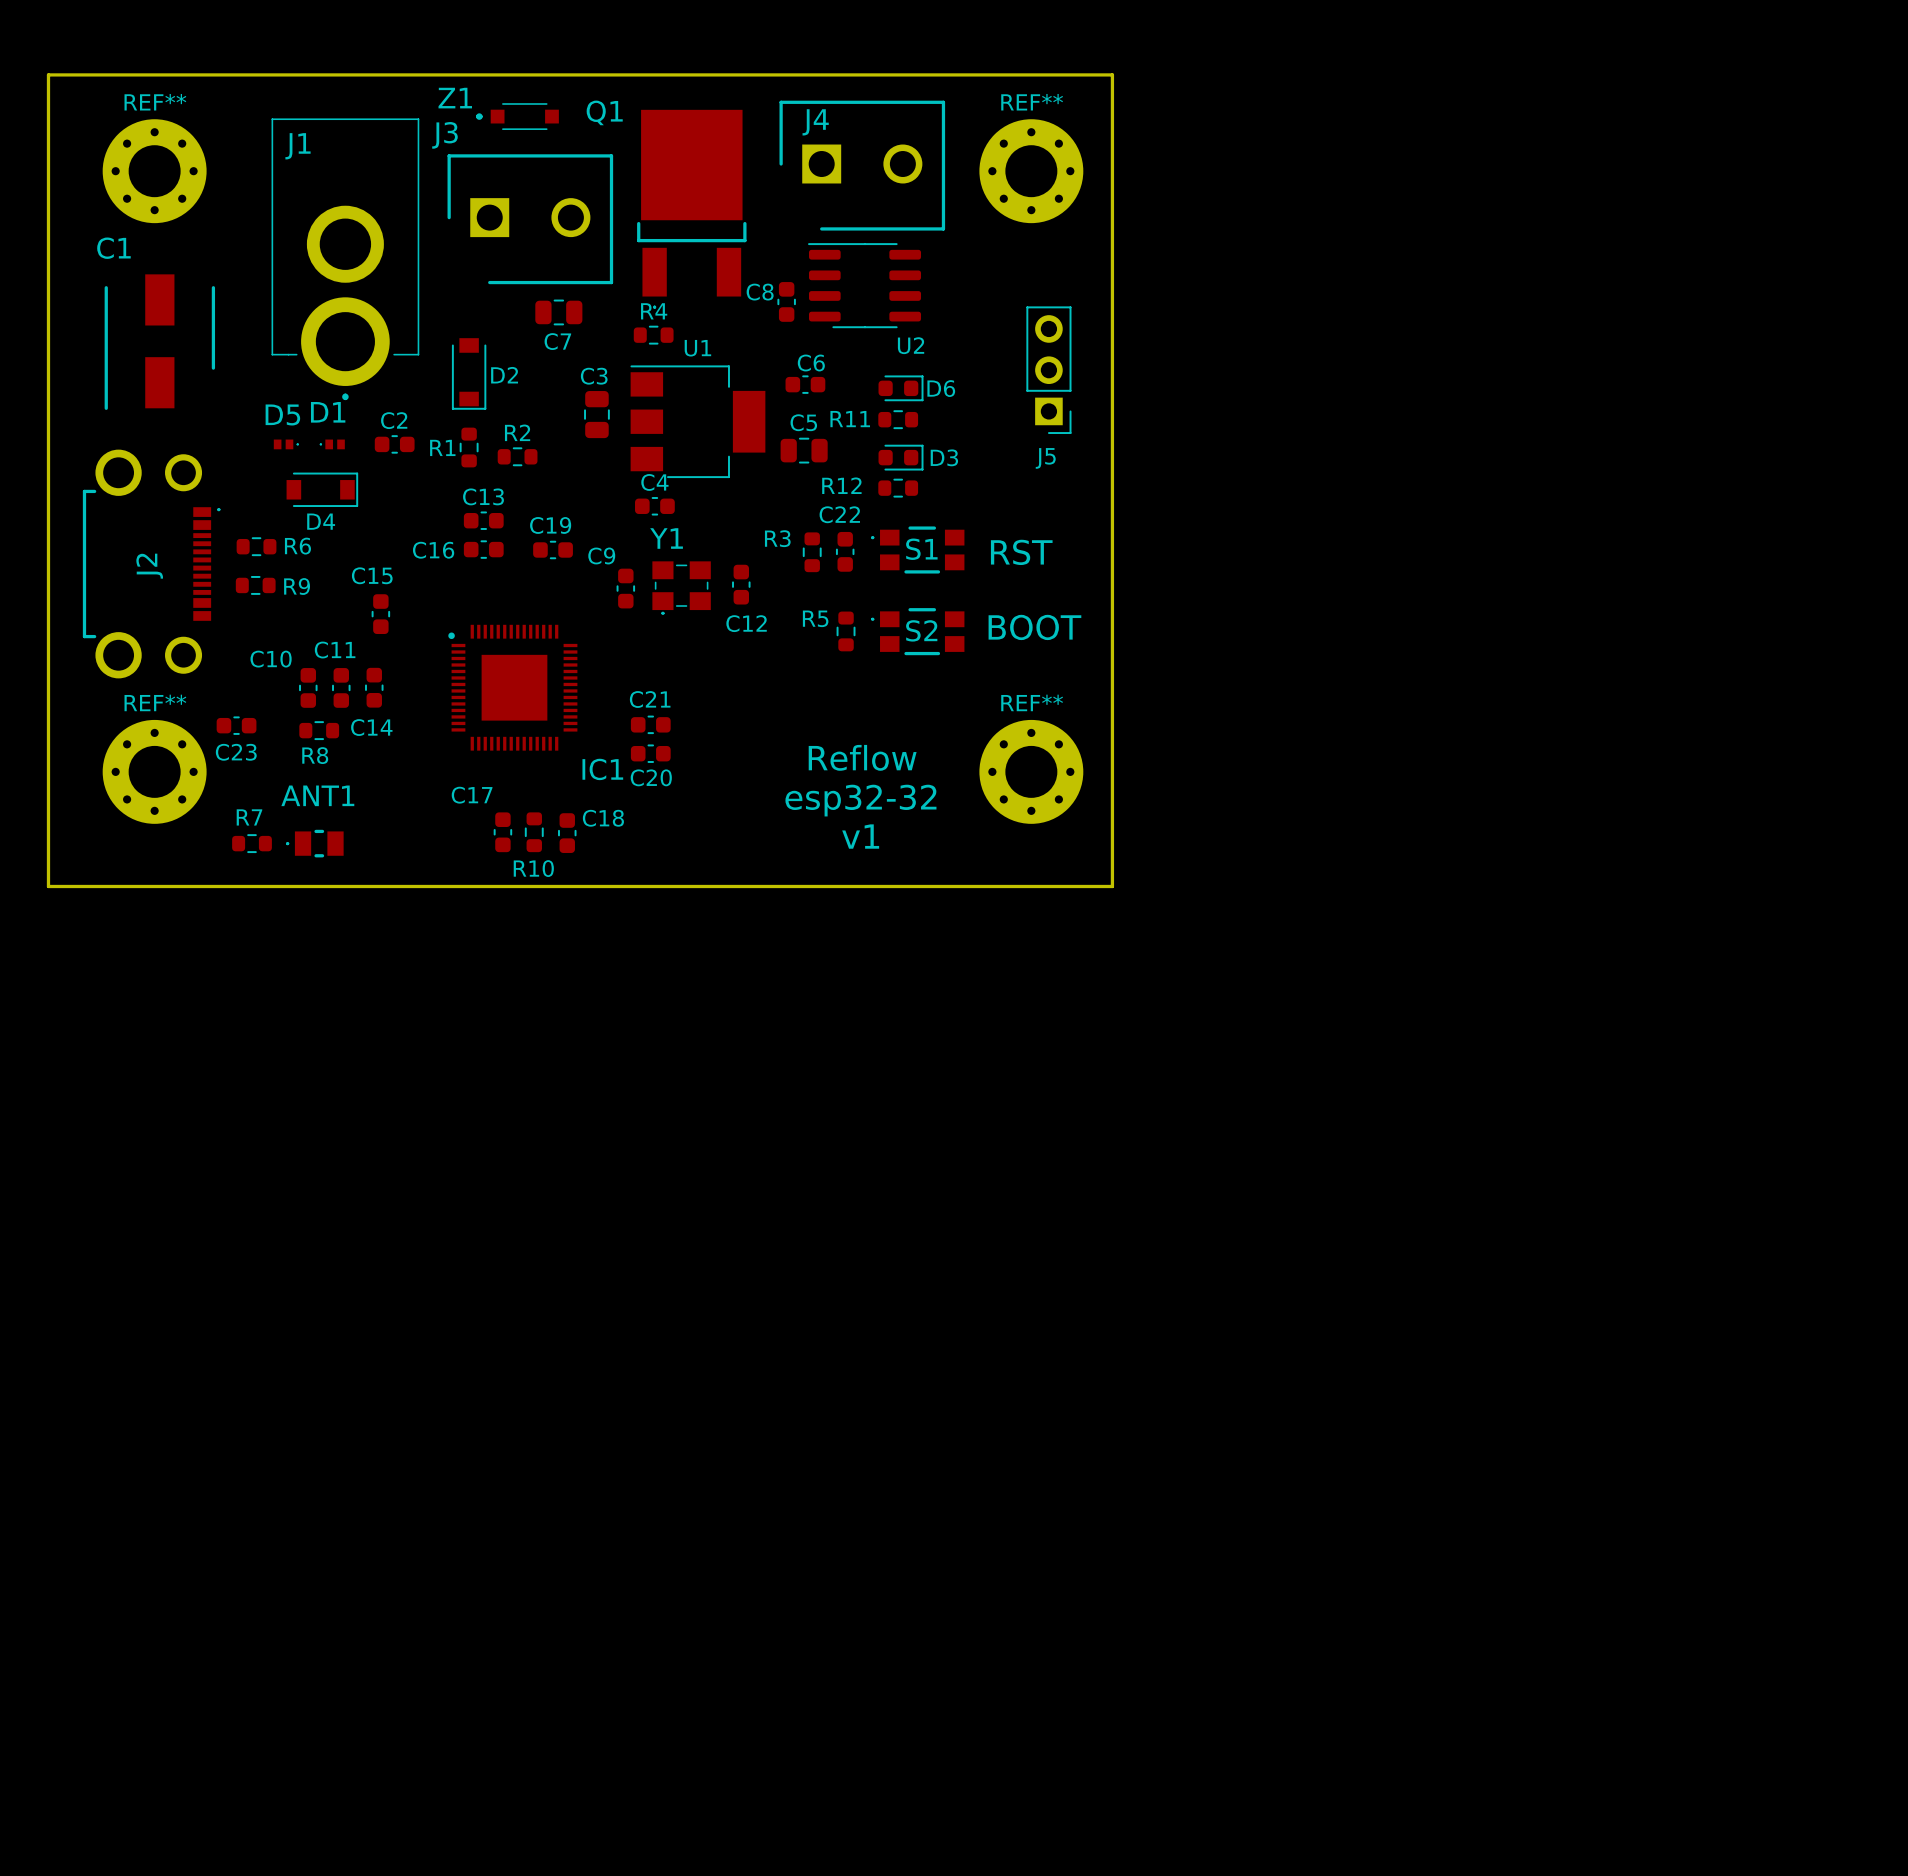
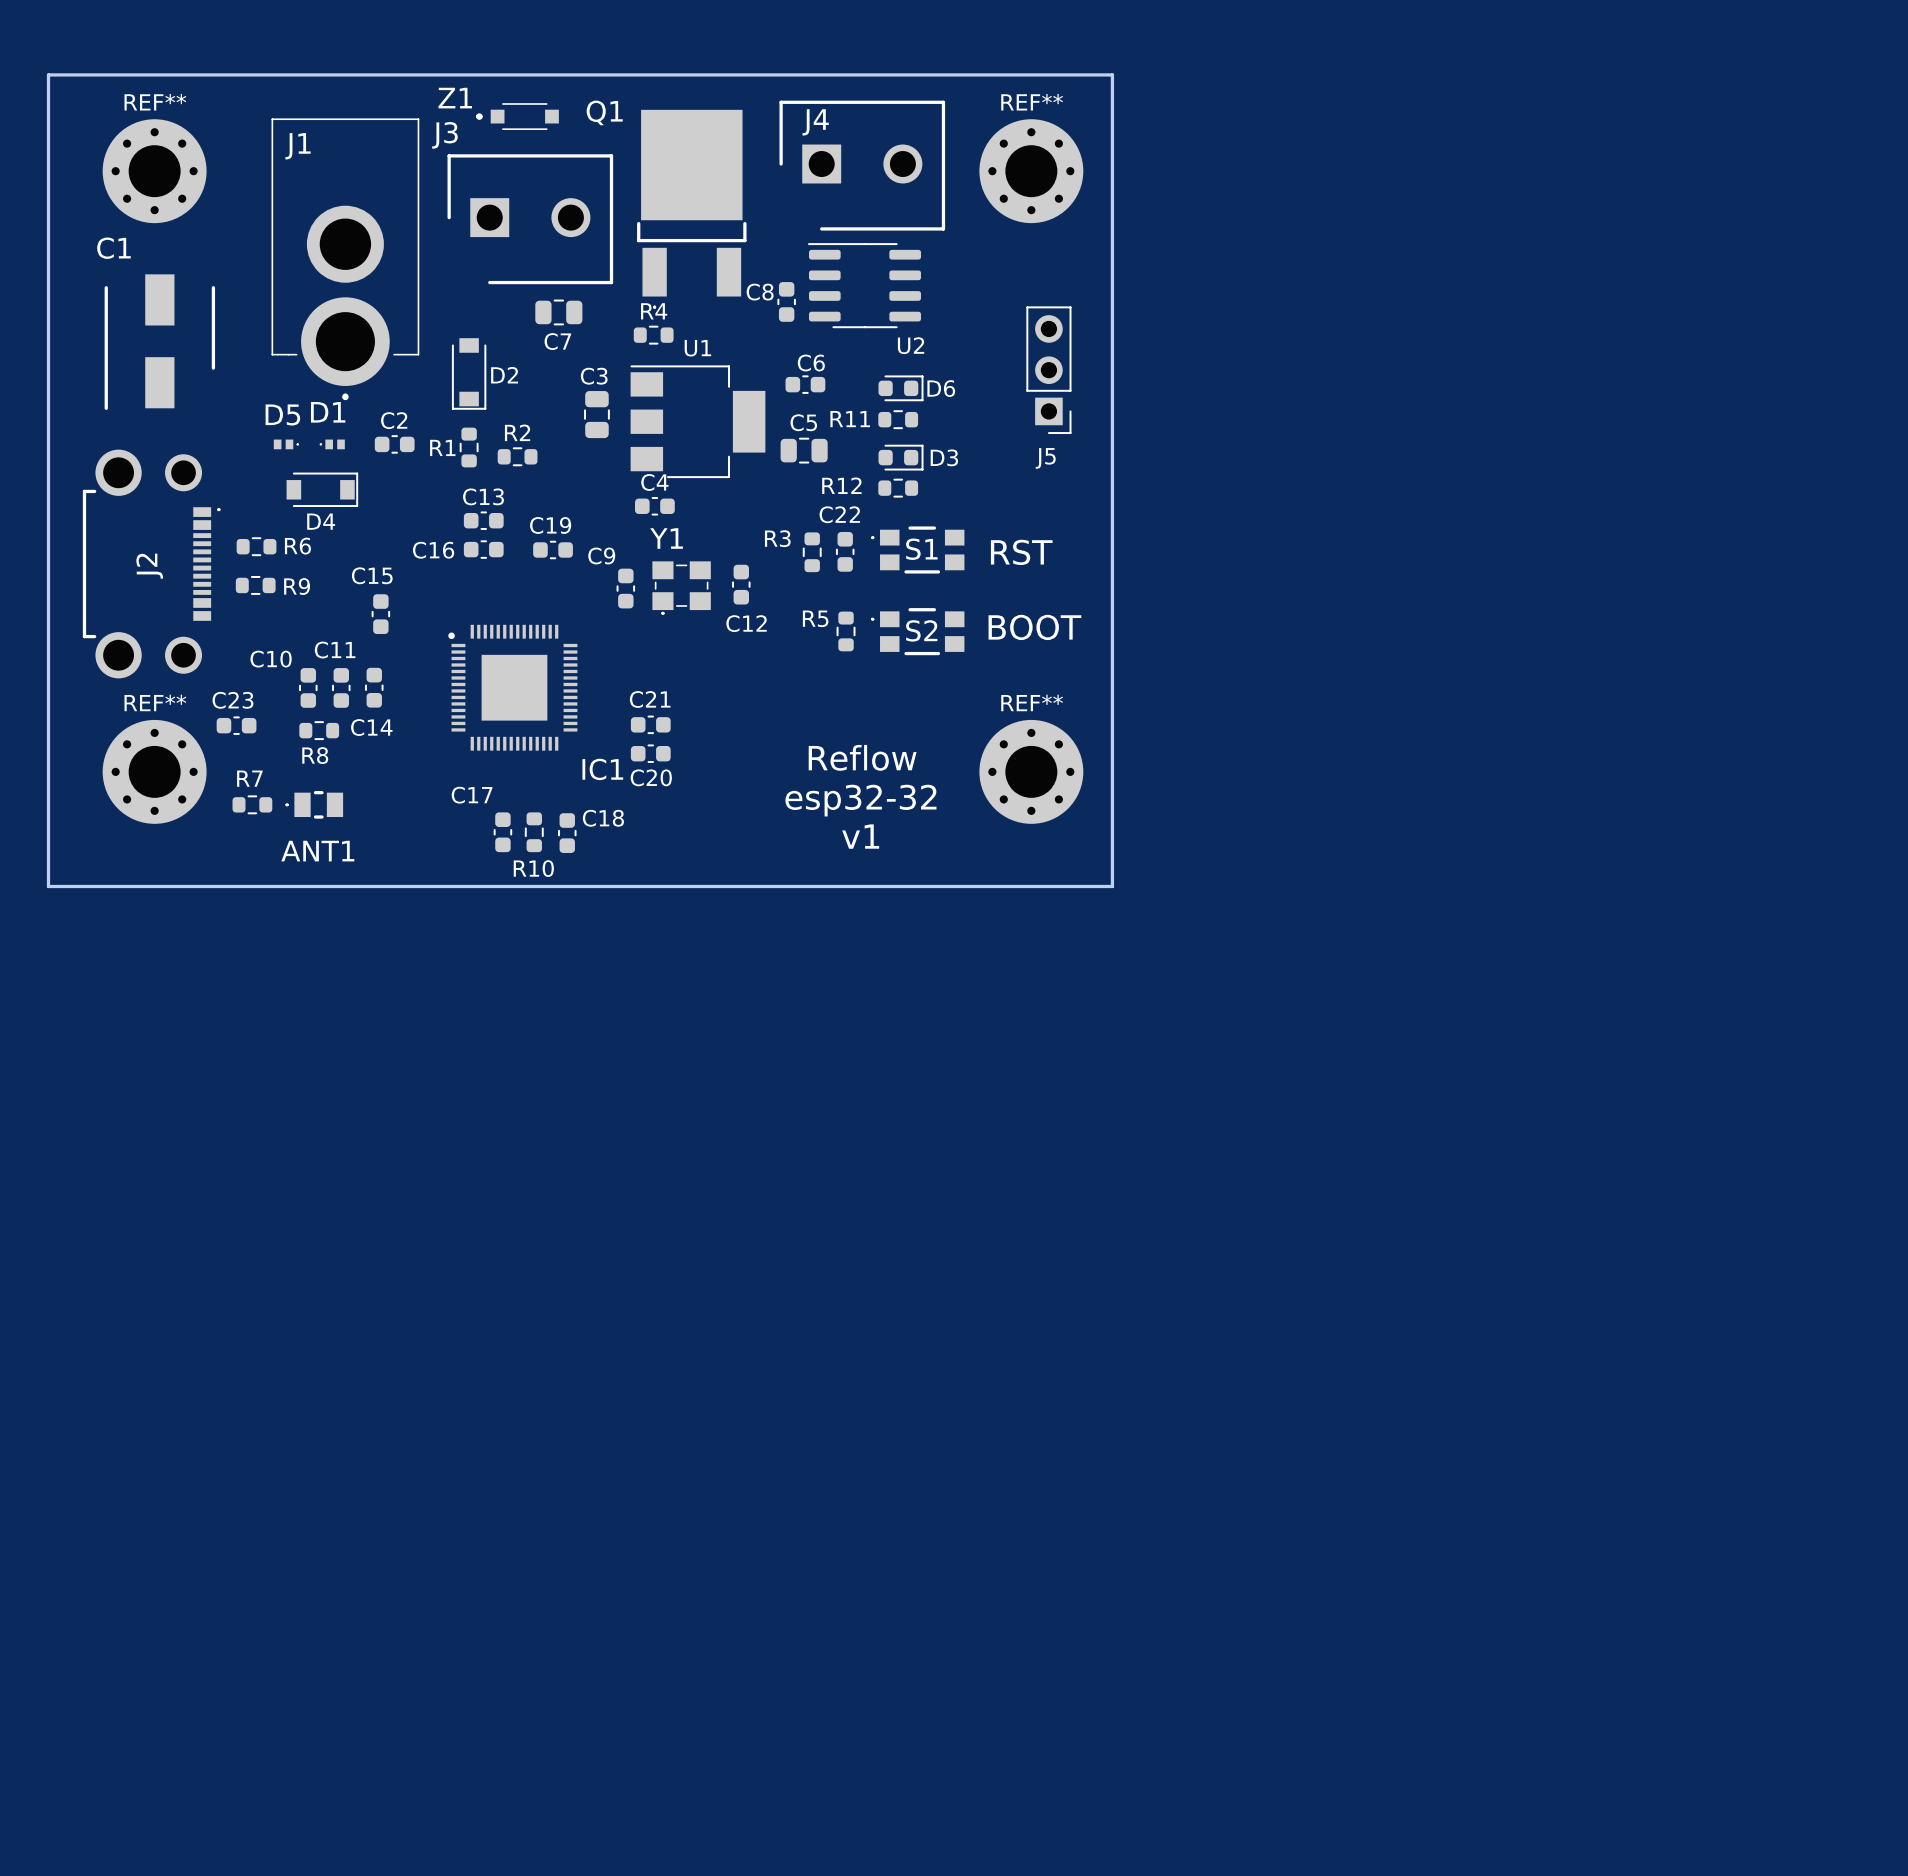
C23 name position: C23 (236, 752) -> C23 (232, 700)
ANT1 name position: ANT1 (317, 795) -> ANT1 (317, 851)
R7 position: (252, 843) -> (252, 804)
ANT1 position: (314, 843) -> (314, 804)

